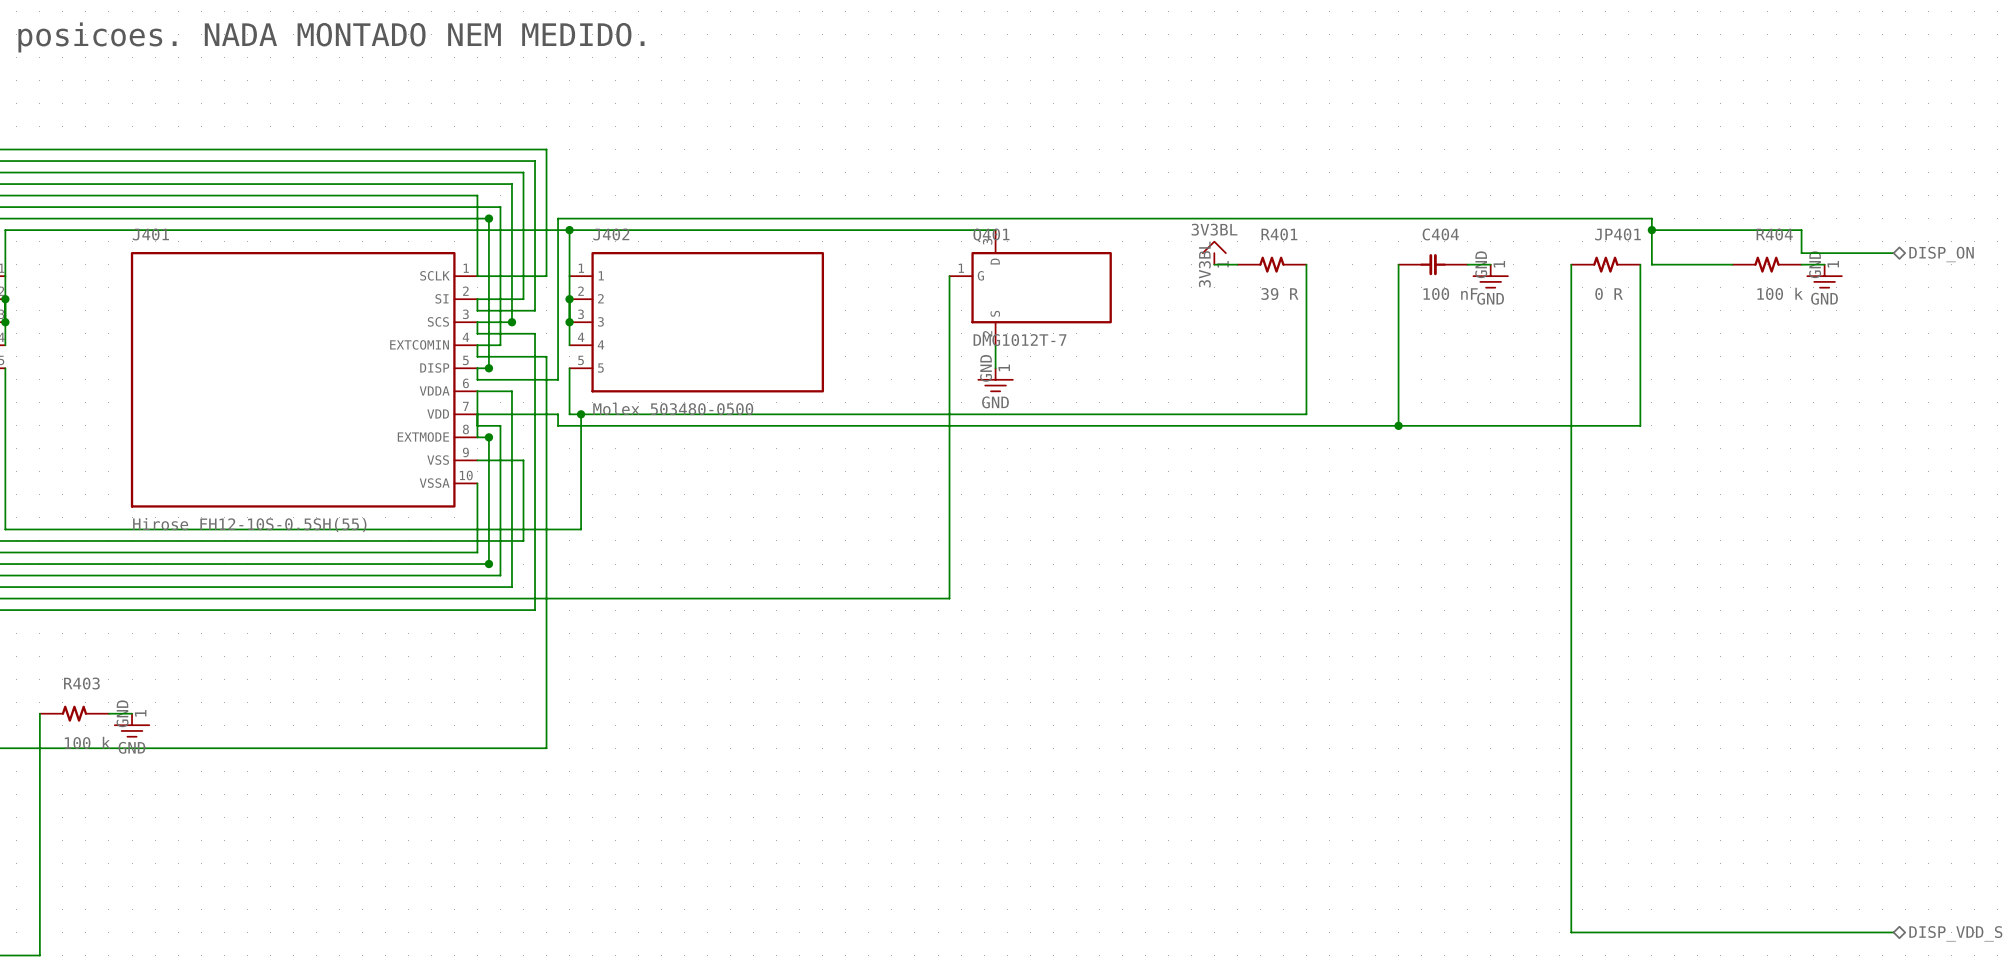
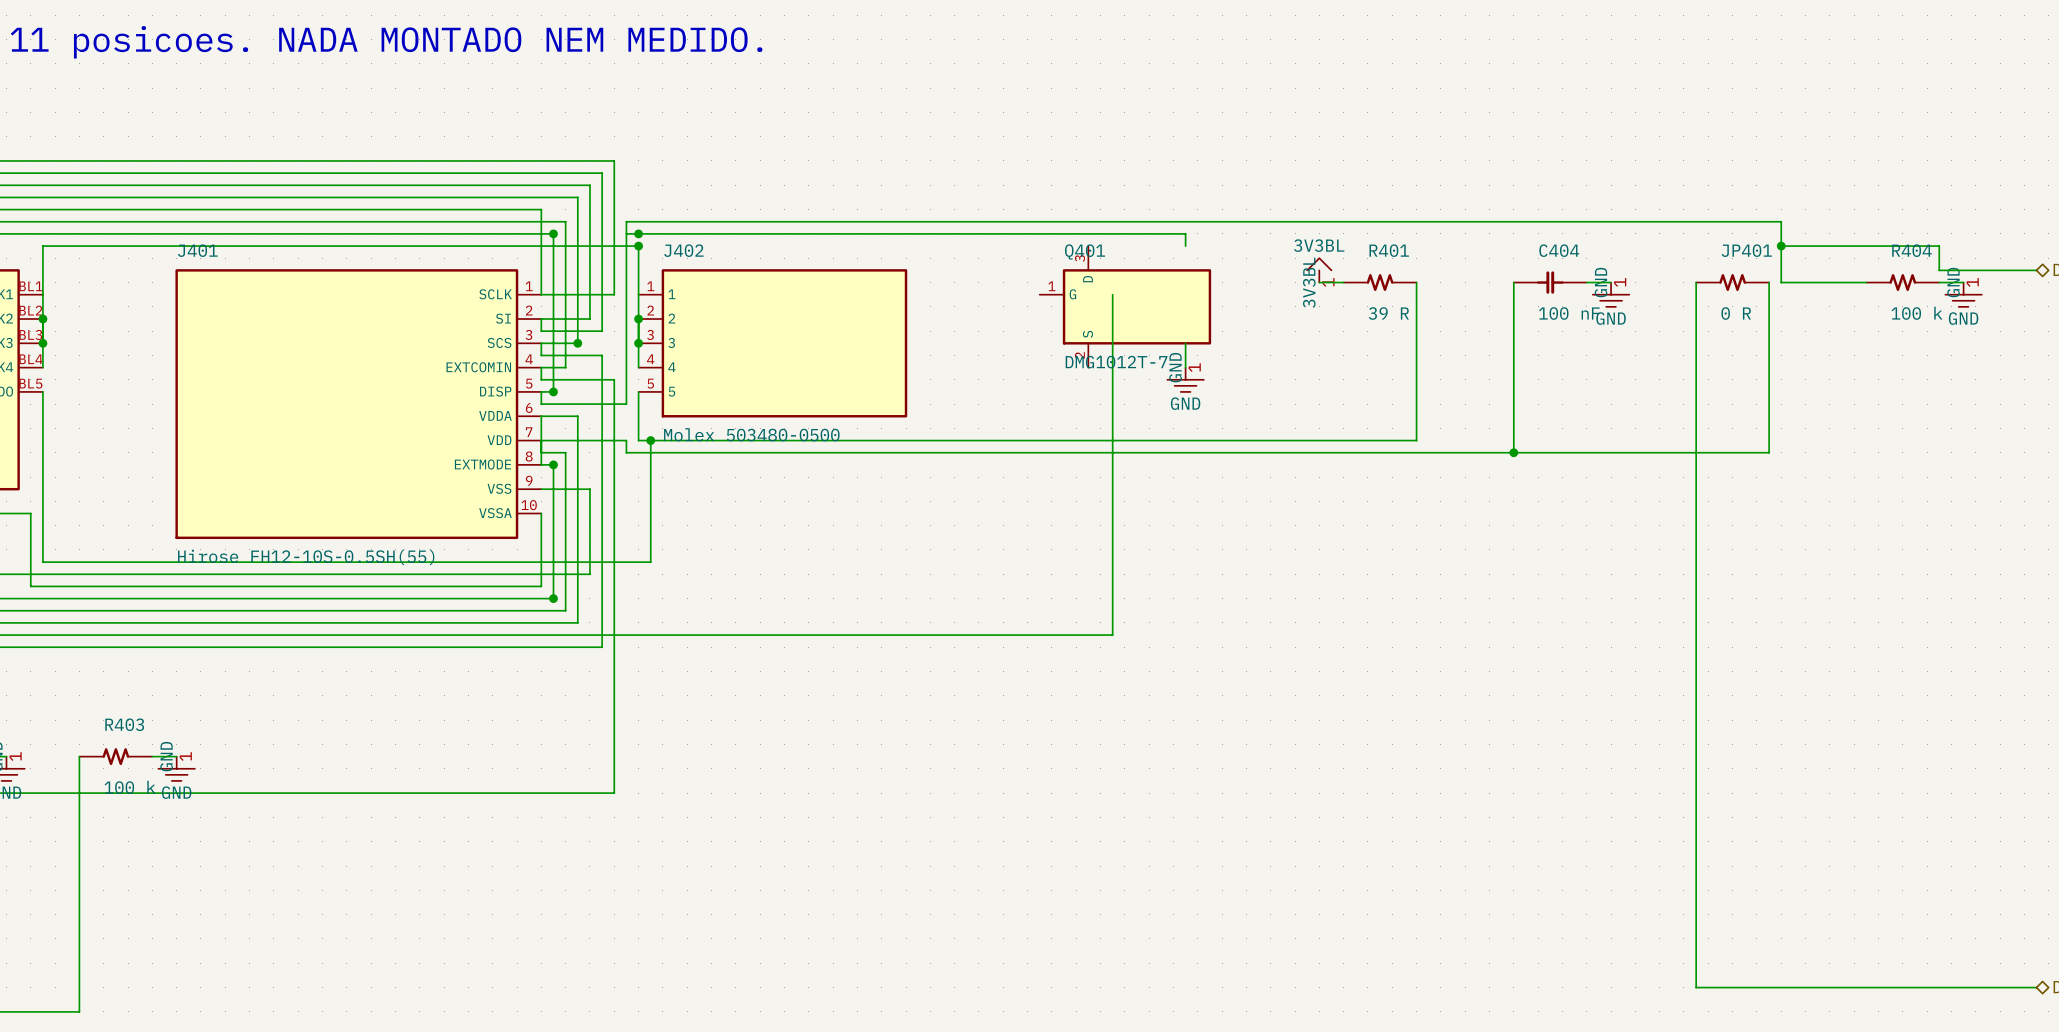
junction: none -> (638, 233)
wire: (1087, 218) (1651, 218) -> (626, 233) (626, 221) (1781, 221) (1781, 233)
wire: none -> (1185, 233) (1185, 246)
wire: (569, 230) (995, 230) -> none
wire: (949, 276) (949, 598) -> (1112, 294) (1112, 635) (1039, 635)
wire: (995, 345) (995, 368) -> (1185, 343) (1185, 367)
power symbol position: GND (995, 379) -> GND (1185, 379)

